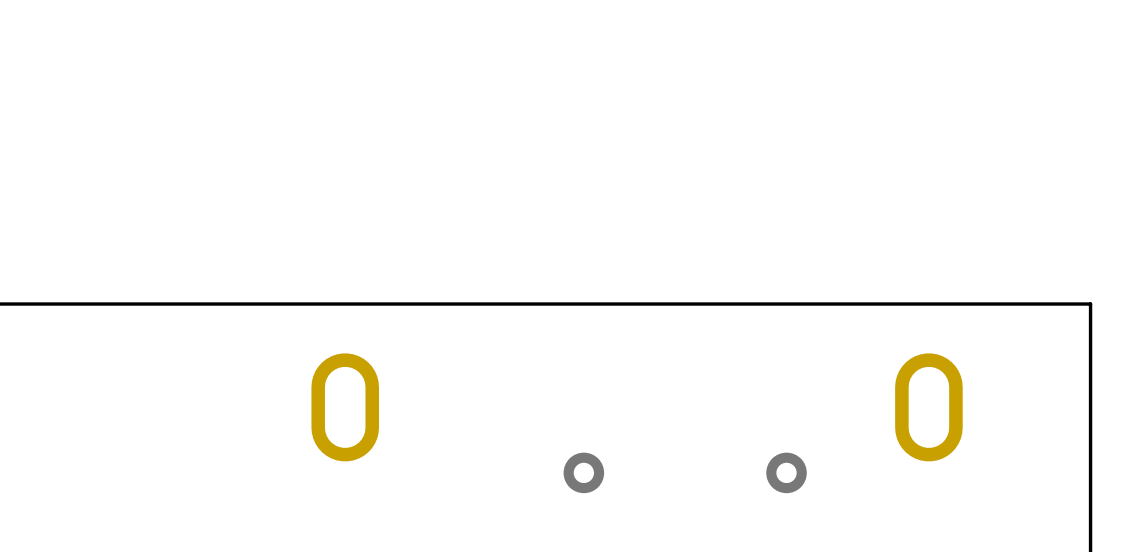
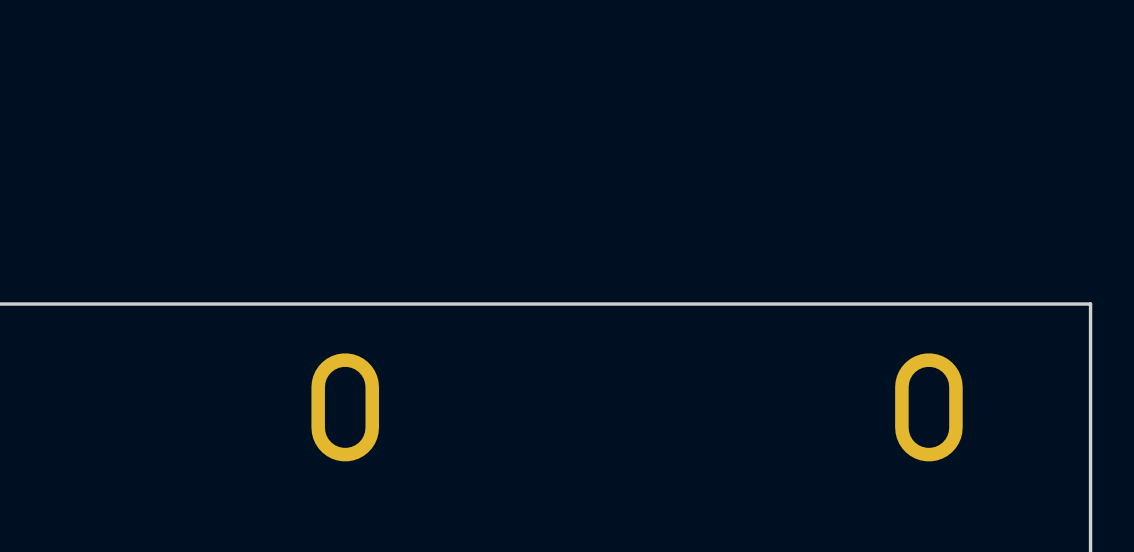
via: (583, 472) -> none
via: (786, 472) -> none

